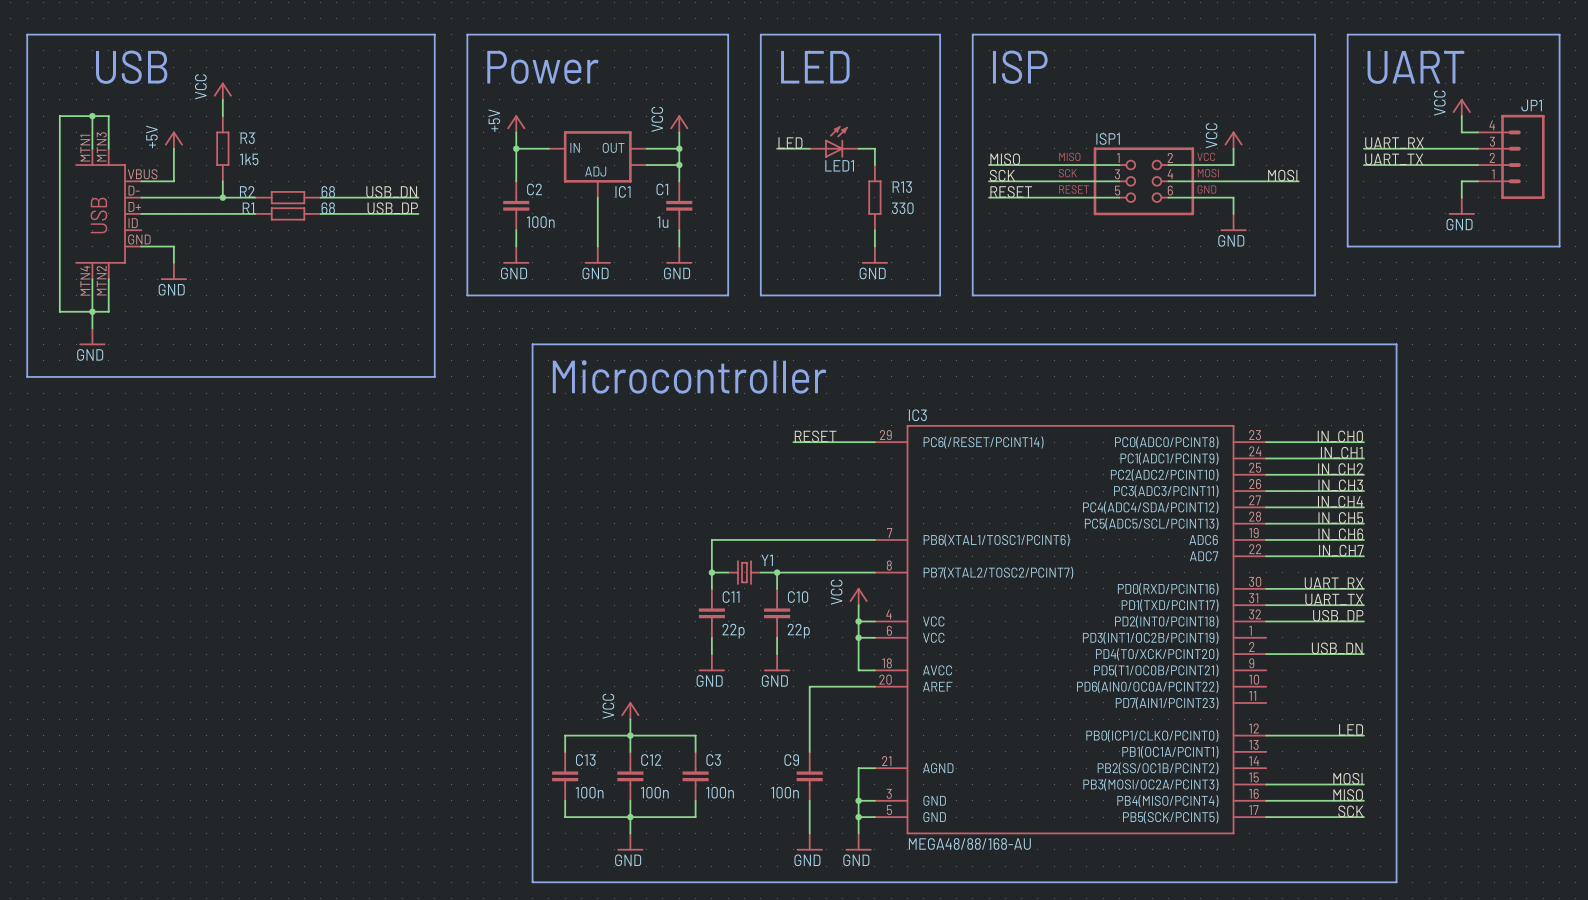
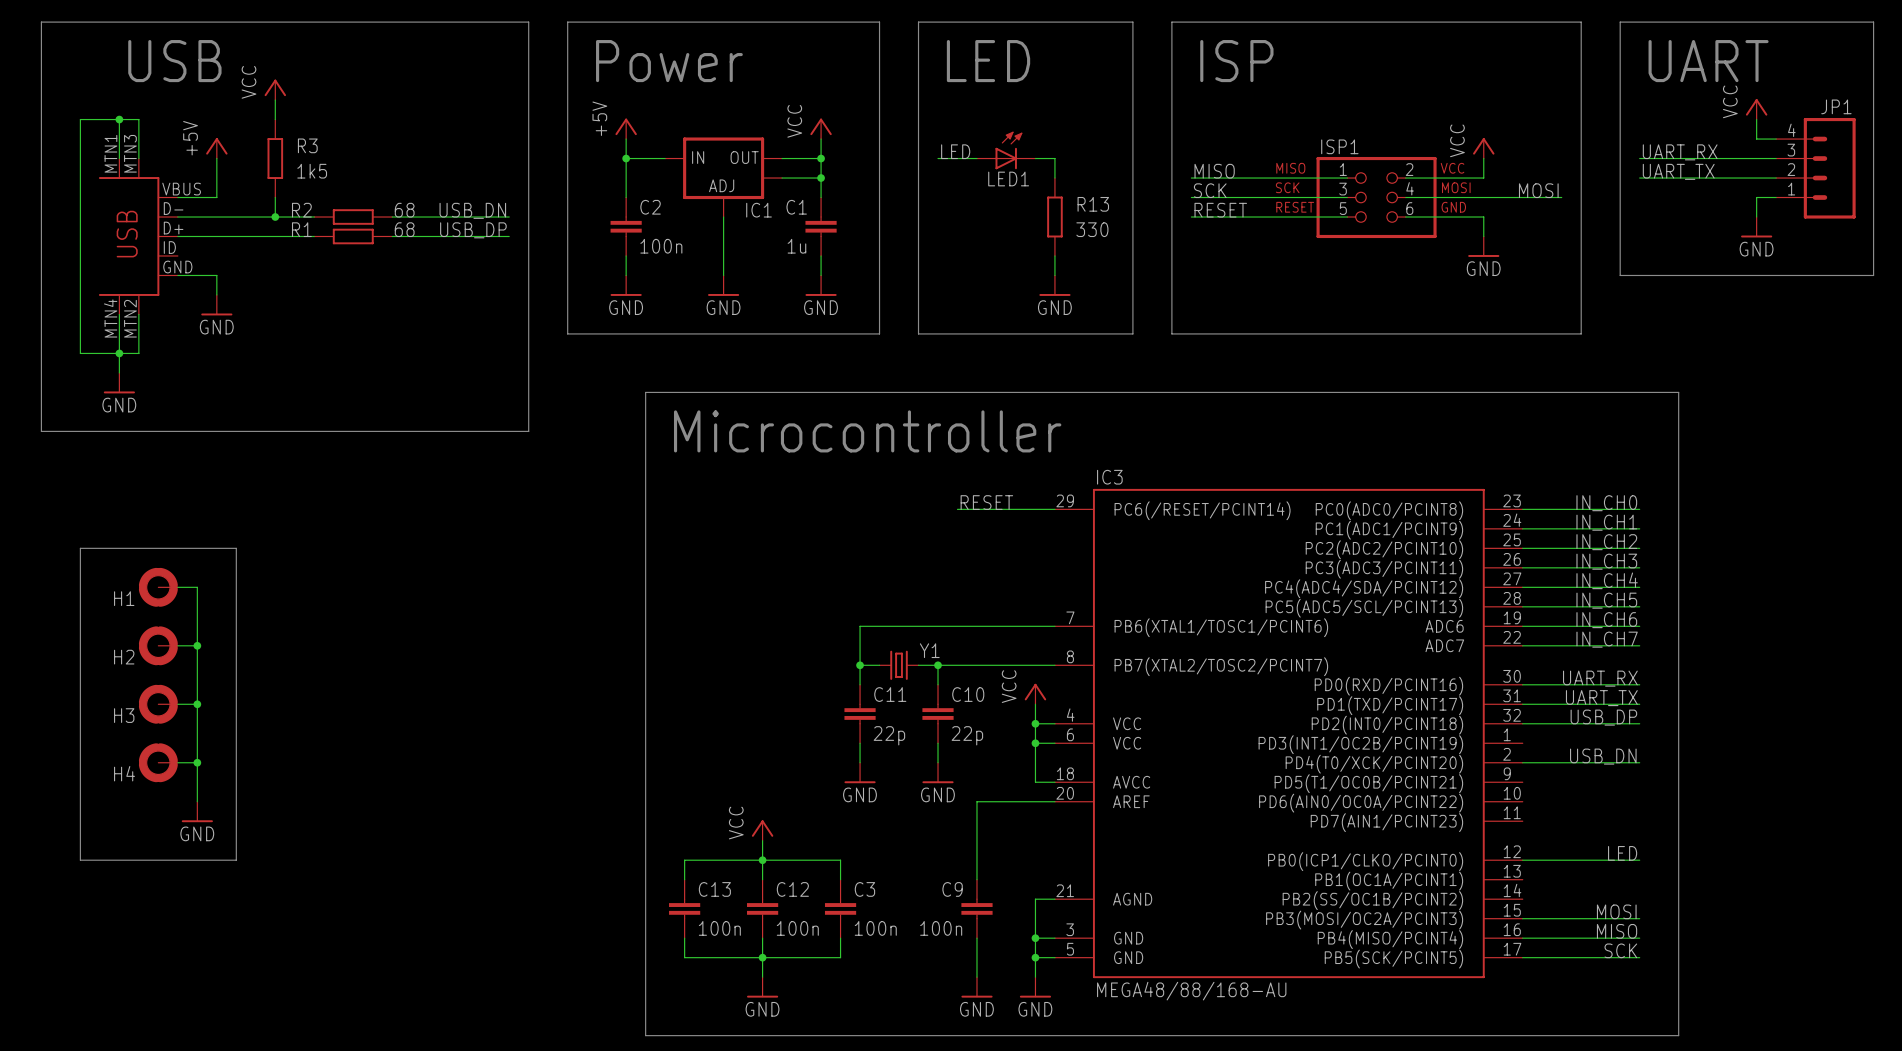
line: none -> (80, 548) (80, 860) (236, 860) (236, 548) (80, 548)
H1: none -> (158, 587)
wire: none -> (177, 587) (197, 587) (197, 801)
H2: none -> (158, 645)
wire: none -> (177, 645) (197, 645)
junction: none -> (197, 645)
H3: none -> (158, 704)
wire: none -> (177, 704) (197, 704)
junction: none -> (197, 704)
H4: none -> (158, 762)
wire: none -> (177, 762) (197, 762)
junction: none -> (197, 762)
power symbol: none -> GND (197, 811)

